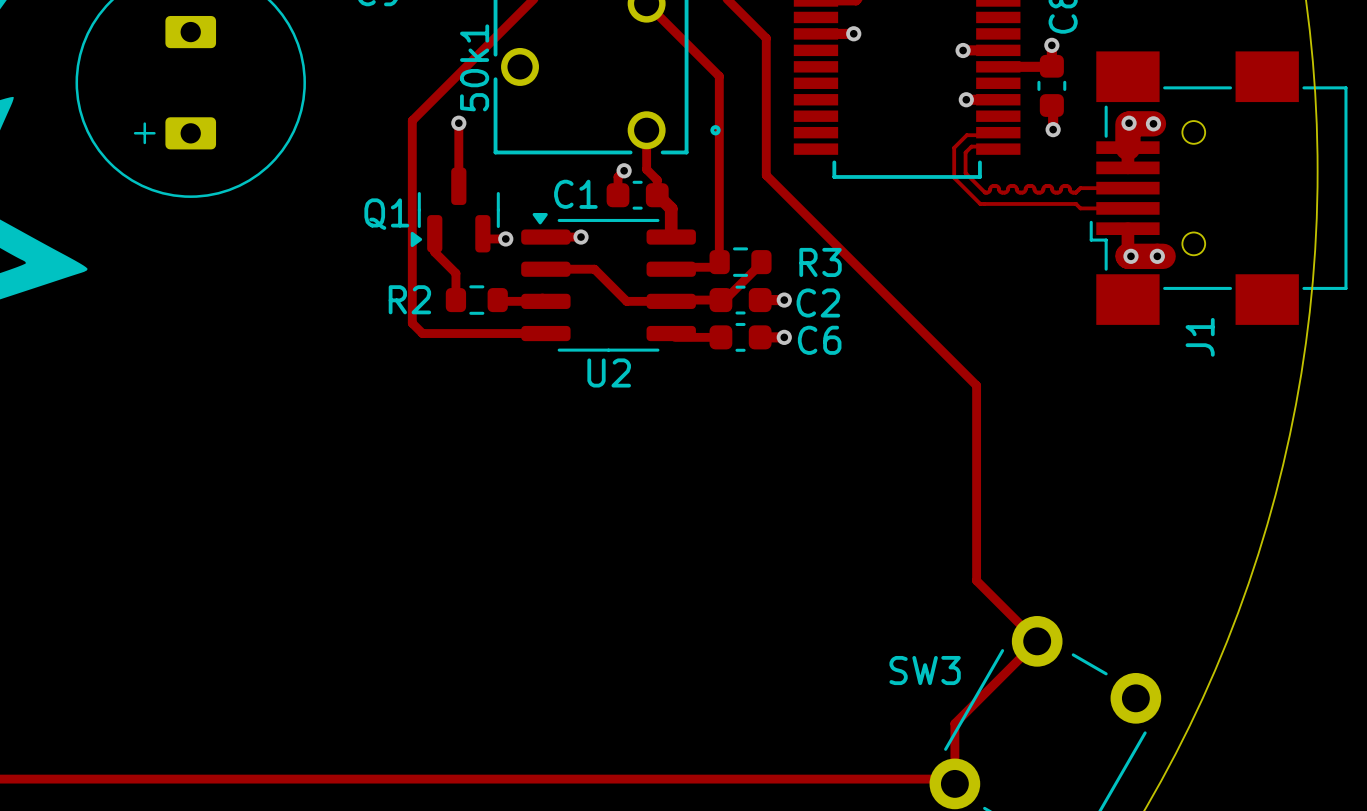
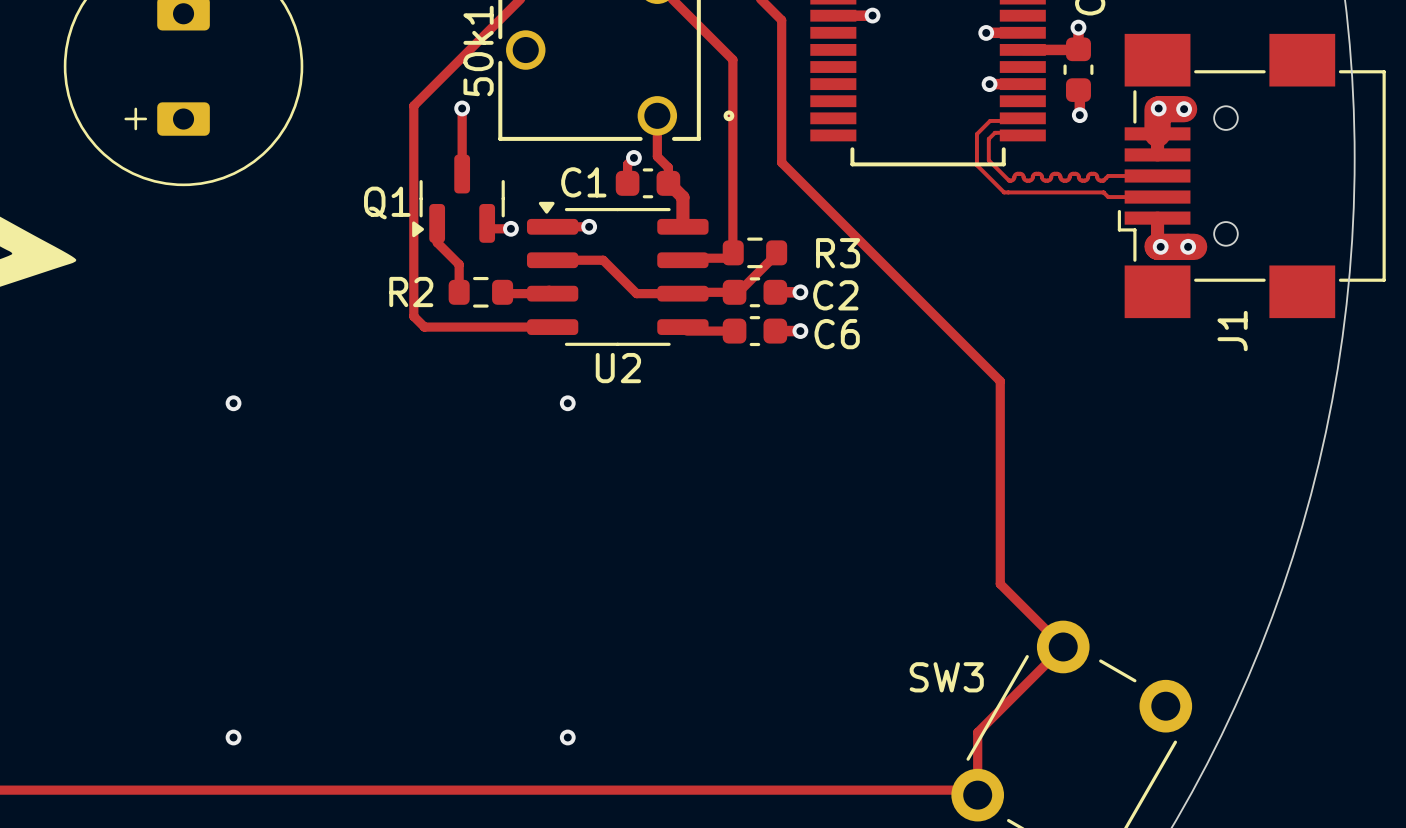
via: none -> (233, 403)
via: none -> (567, 403)
via: none -> (233, 737)
via: none -> (567, 737)

